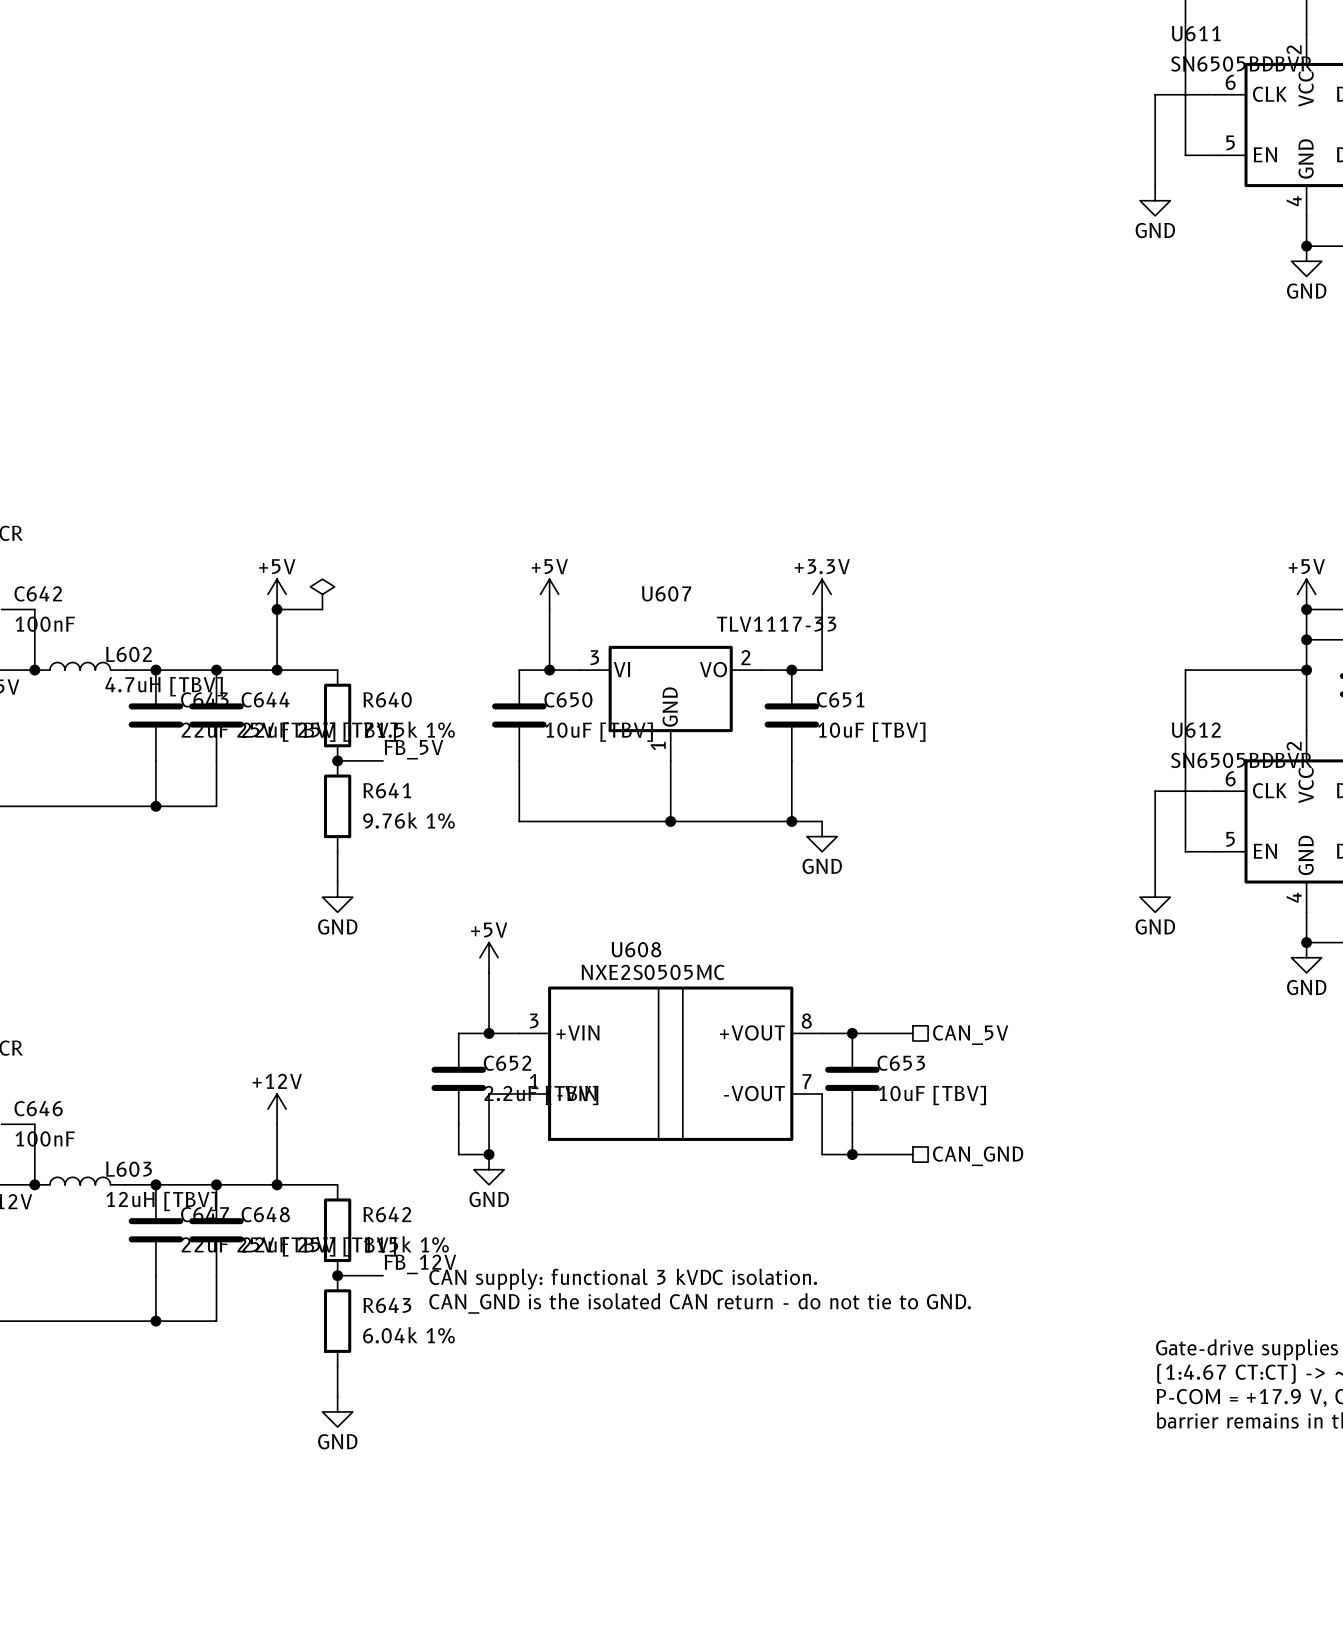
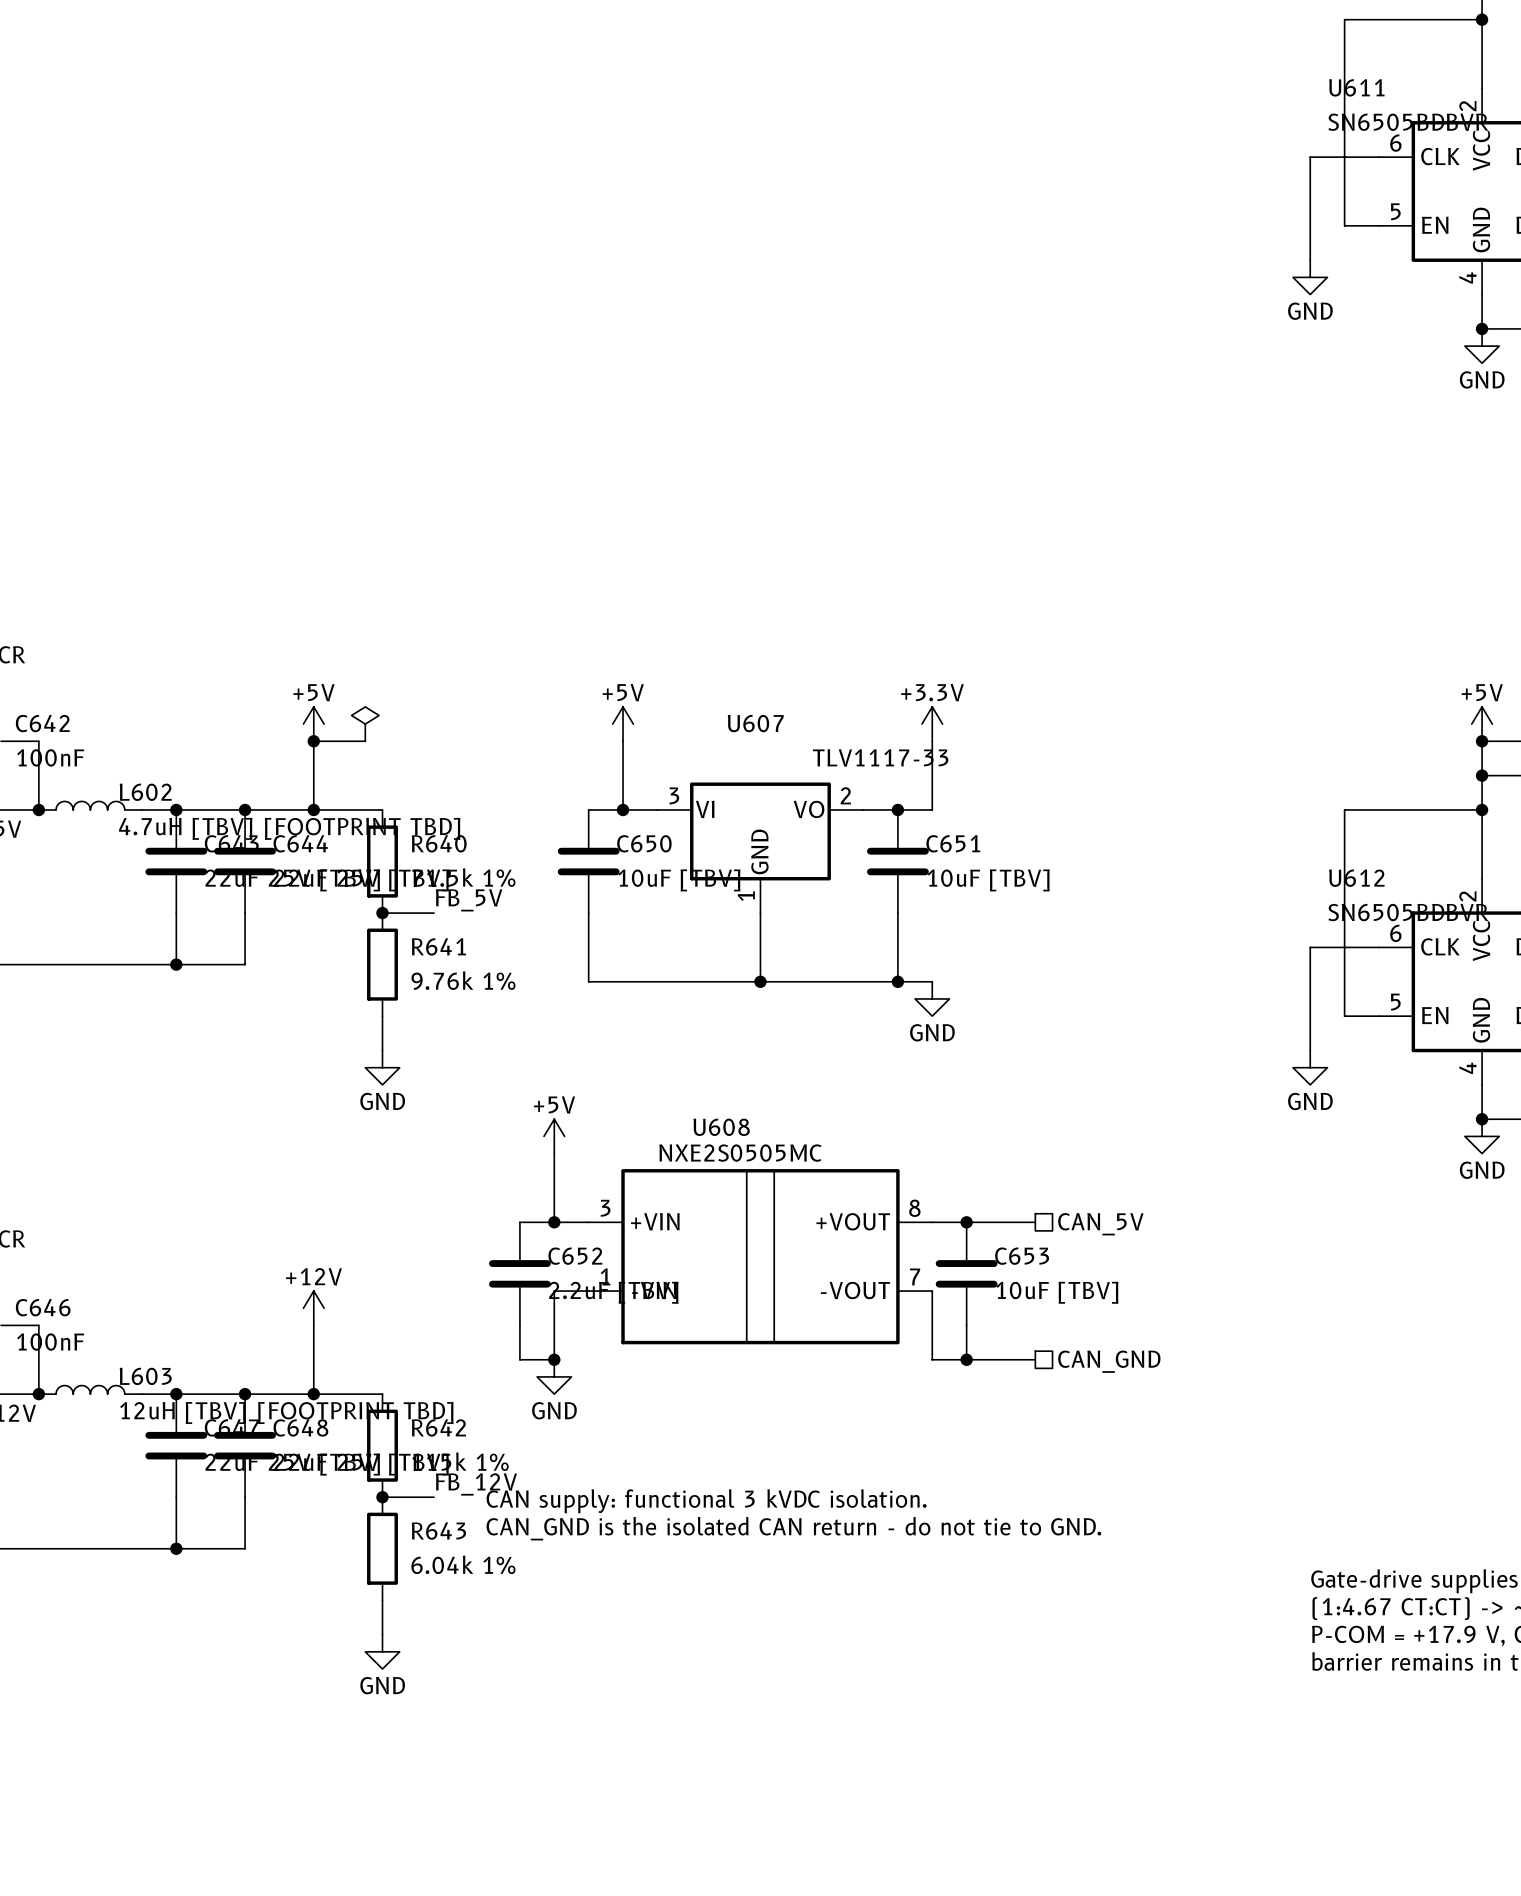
L602 value: 4.7uH [TBV] (164, 686) -> 4.7uH [TBV] [FOOTPRINT TBD] (289, 828)
L603 value: 12uH [TBV] (161, 1201) -> 12uH [TBV] [FOOTPRINT TBD] (286, 1413)

